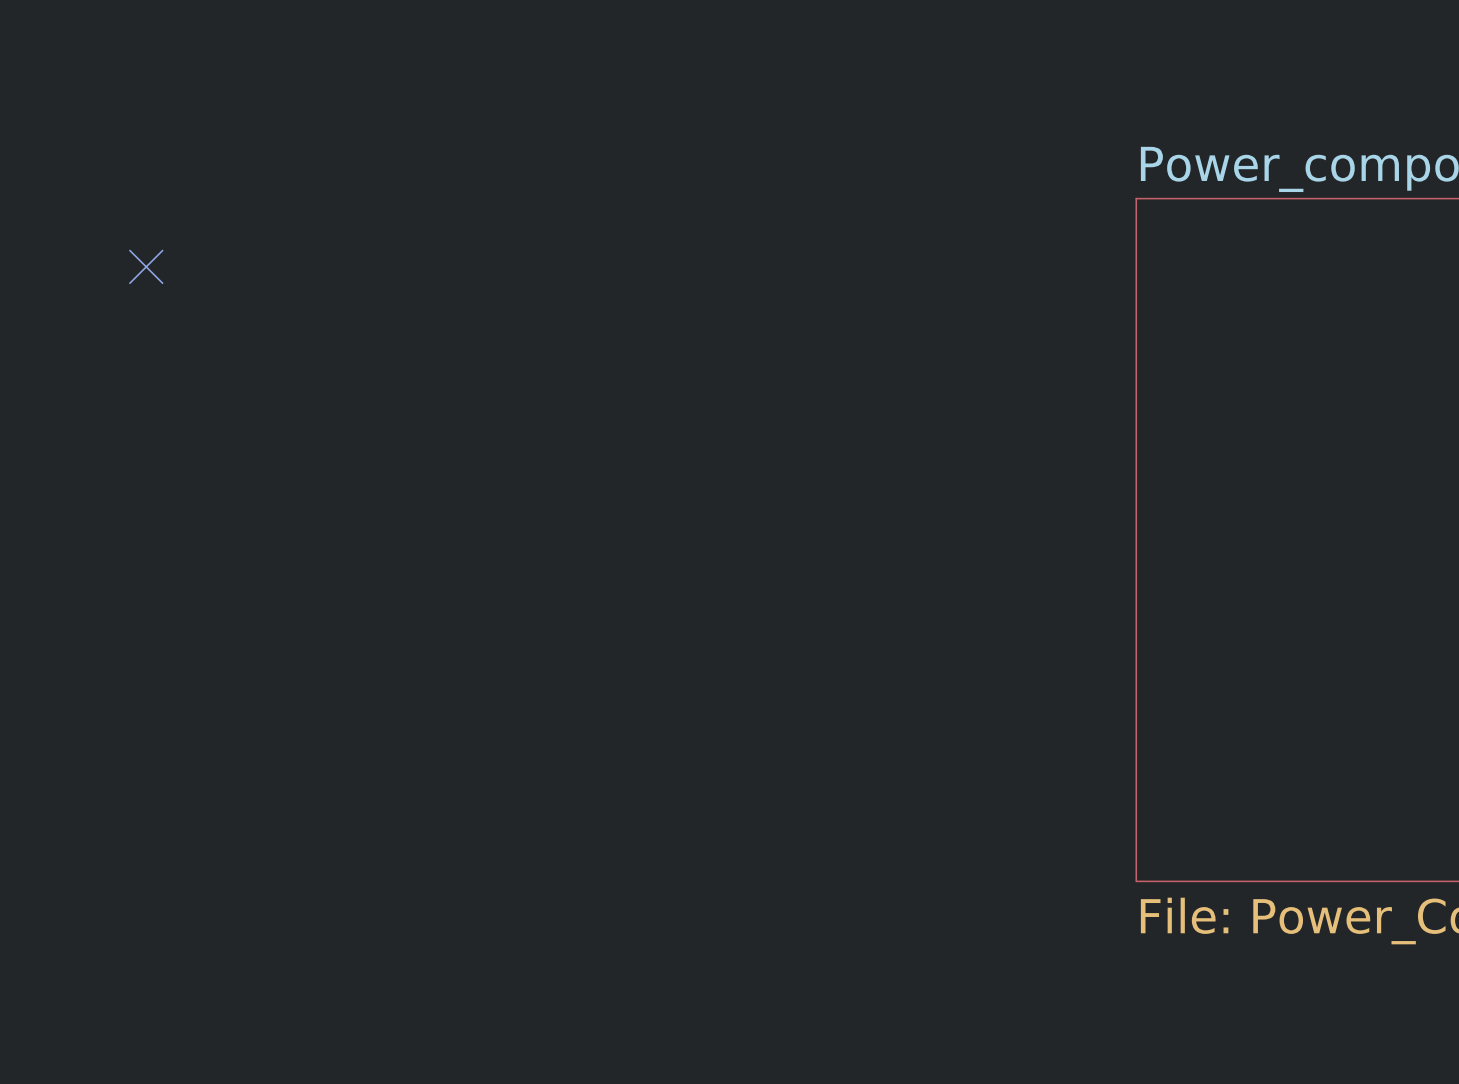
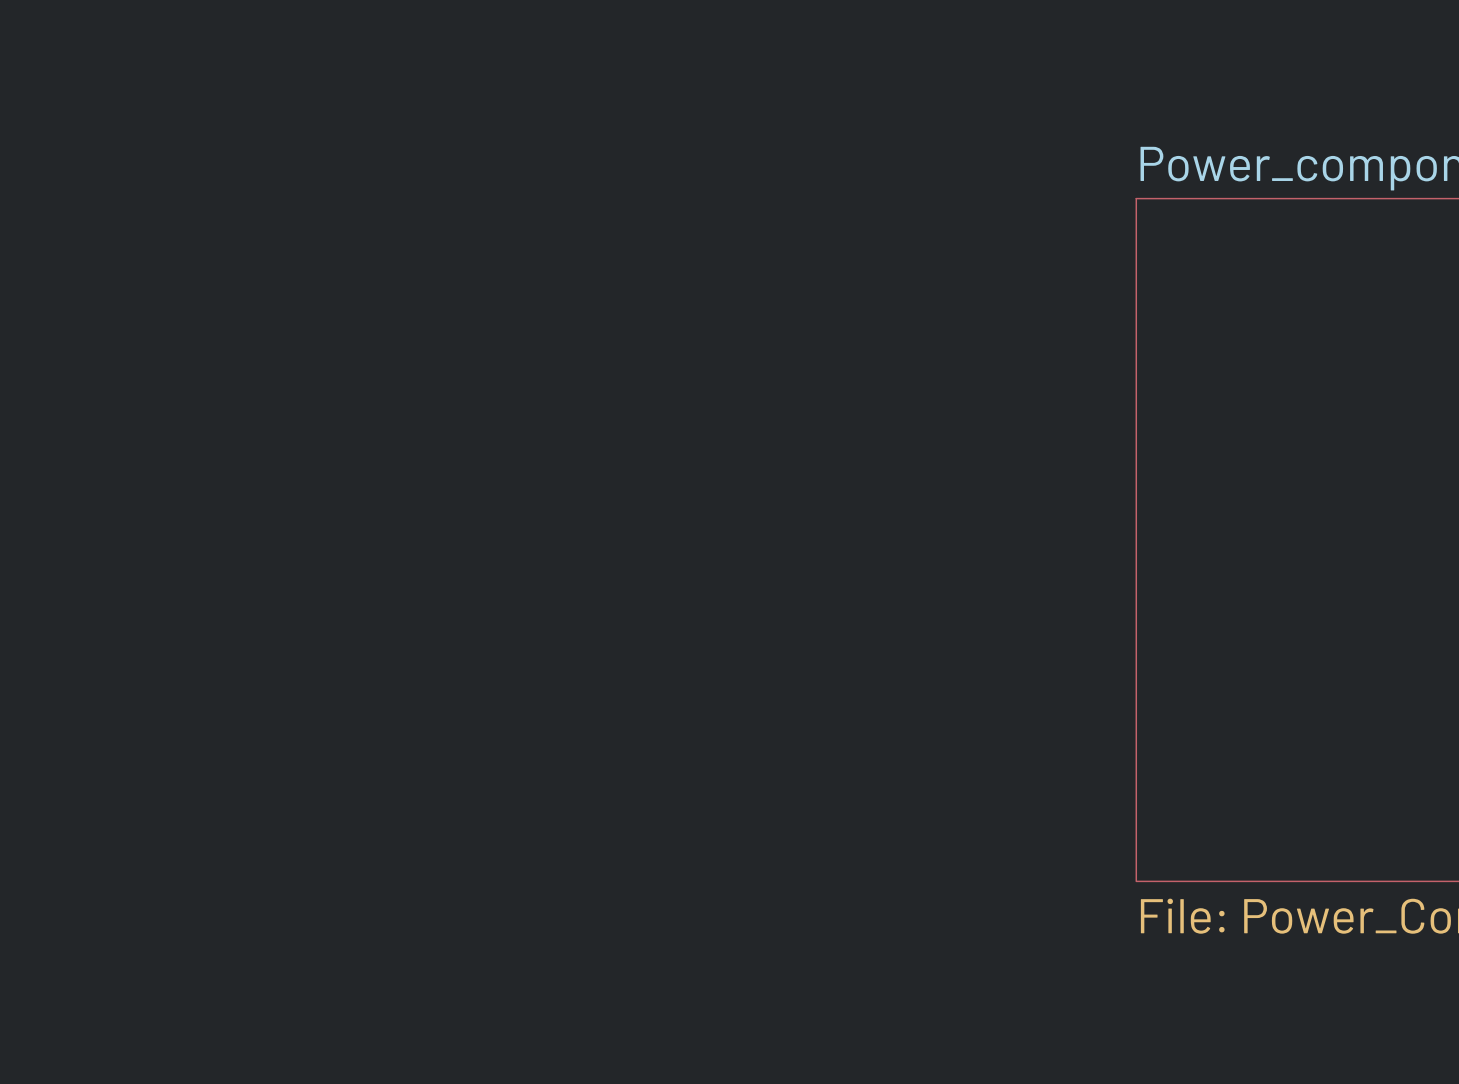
no-connect mark: (146, 266) -> none

